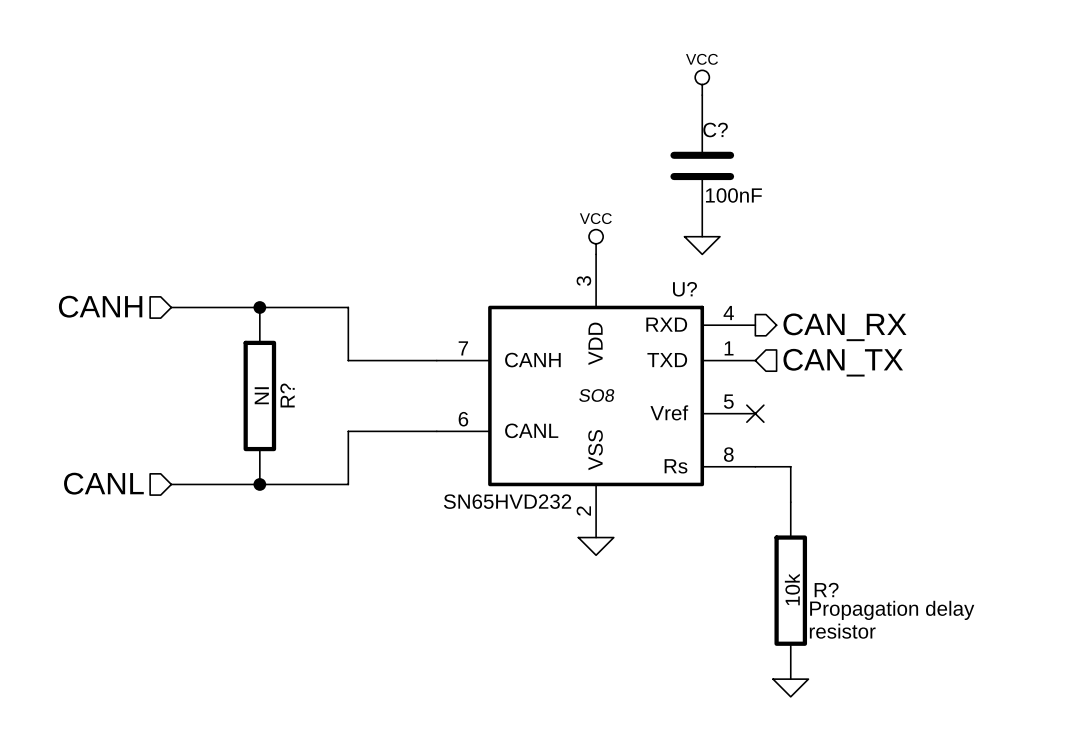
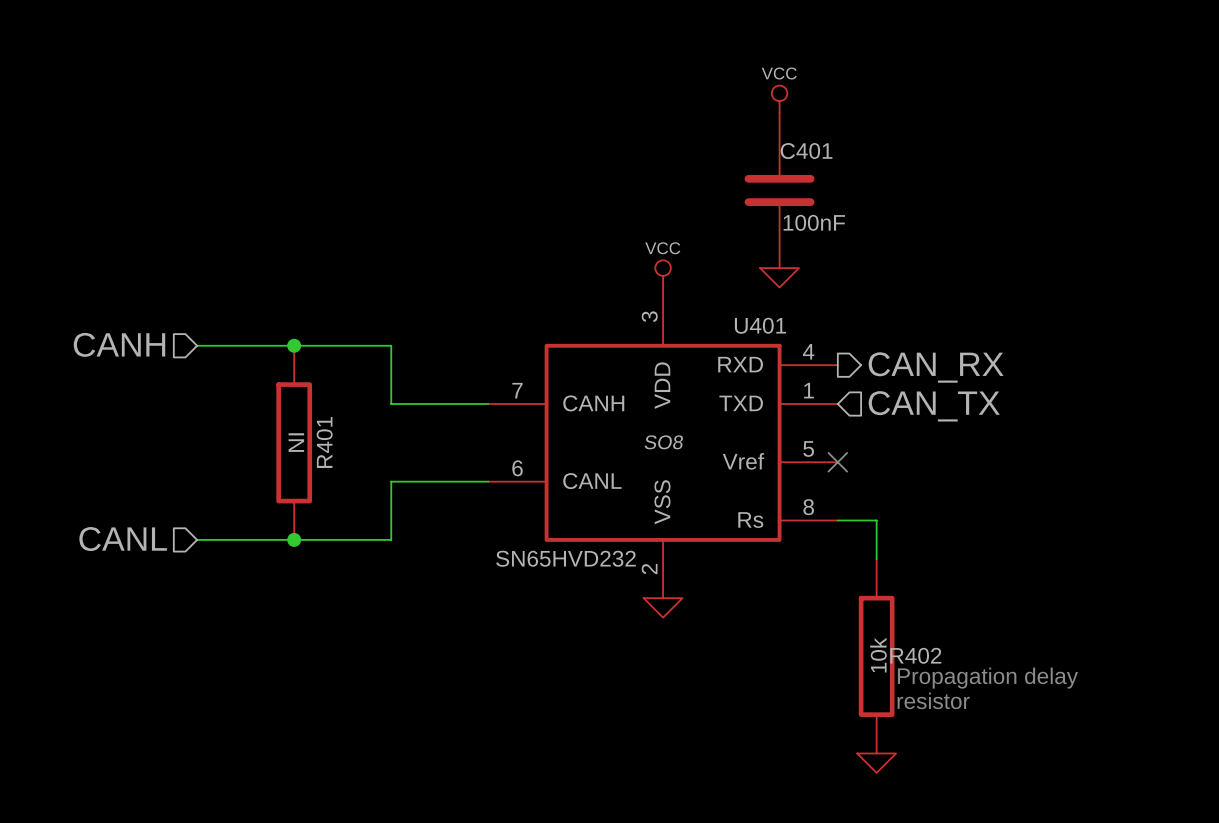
C? name: C? (715, 129) -> C401 (806, 151)
U? name: U? (684, 289) -> U401 (760, 325)
R? name: R? (287, 395) -> R401 (324, 442)
R? name: R? (826, 590) -> R402 (915, 655)

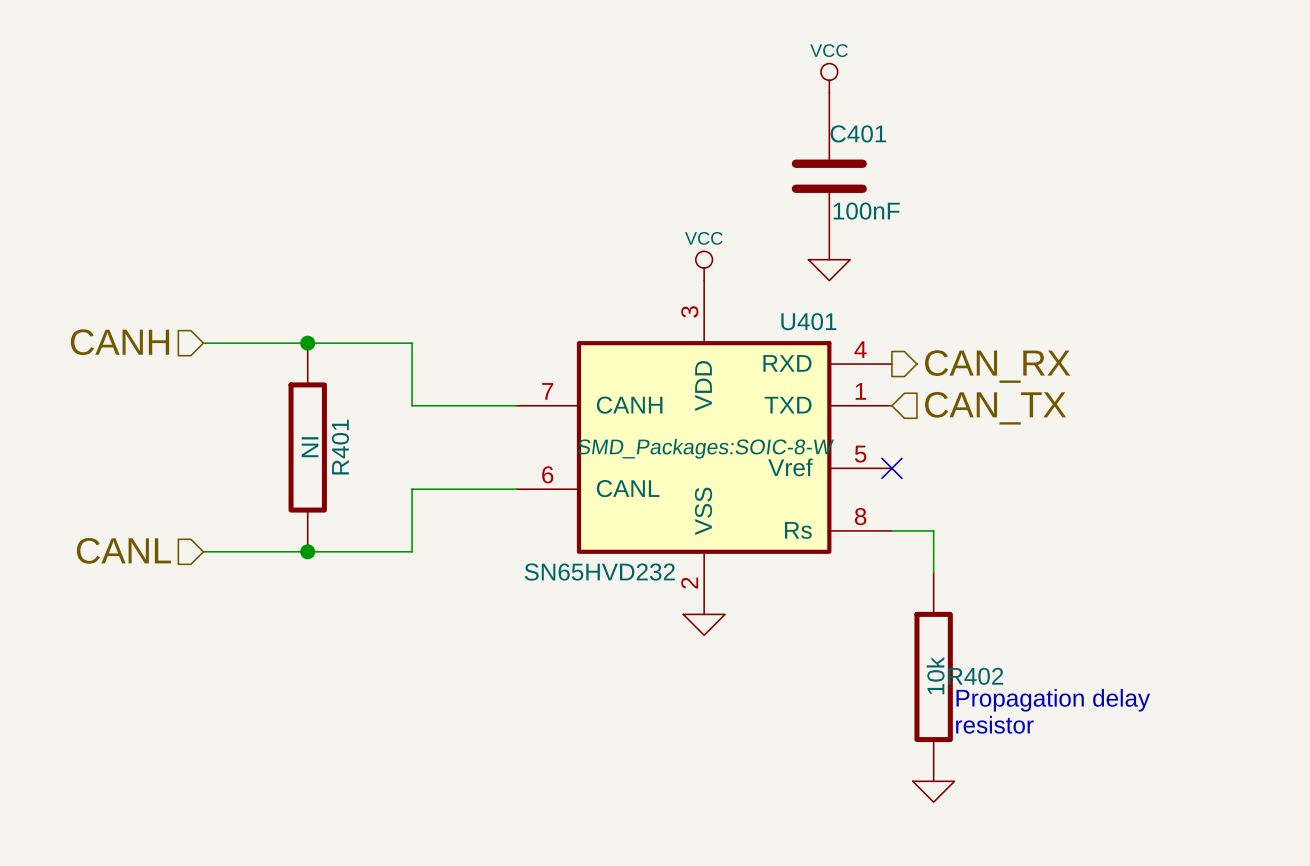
U401 text: SO8 (663, 442) -> SMD_Packages:SOIC-8-W (705, 448)

